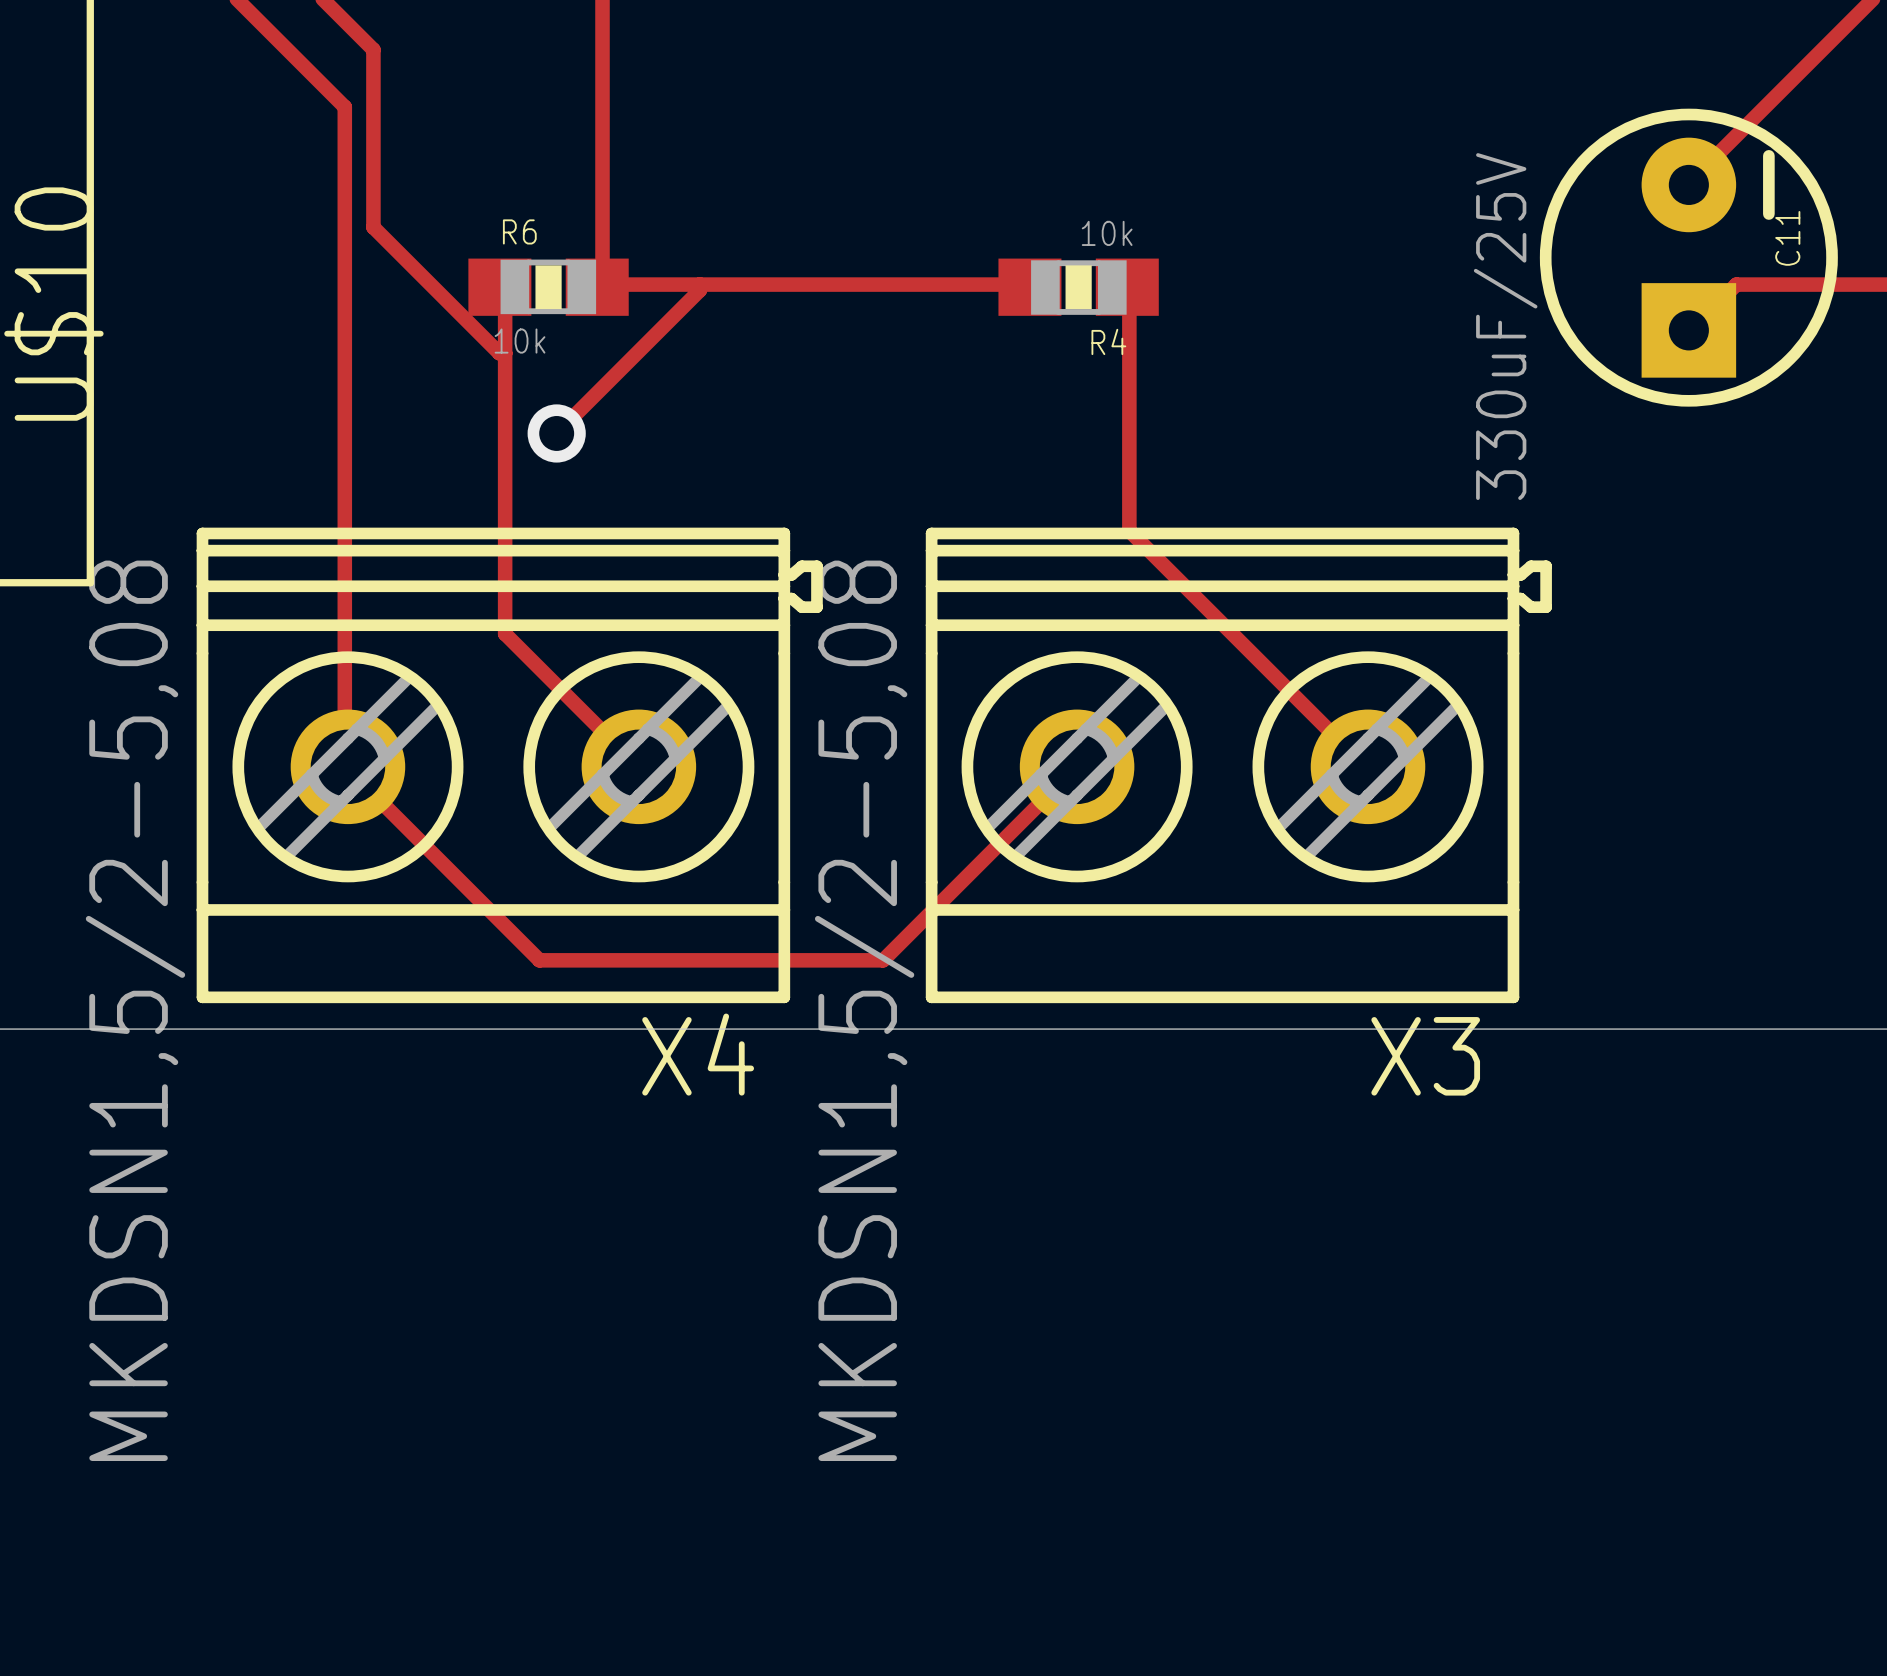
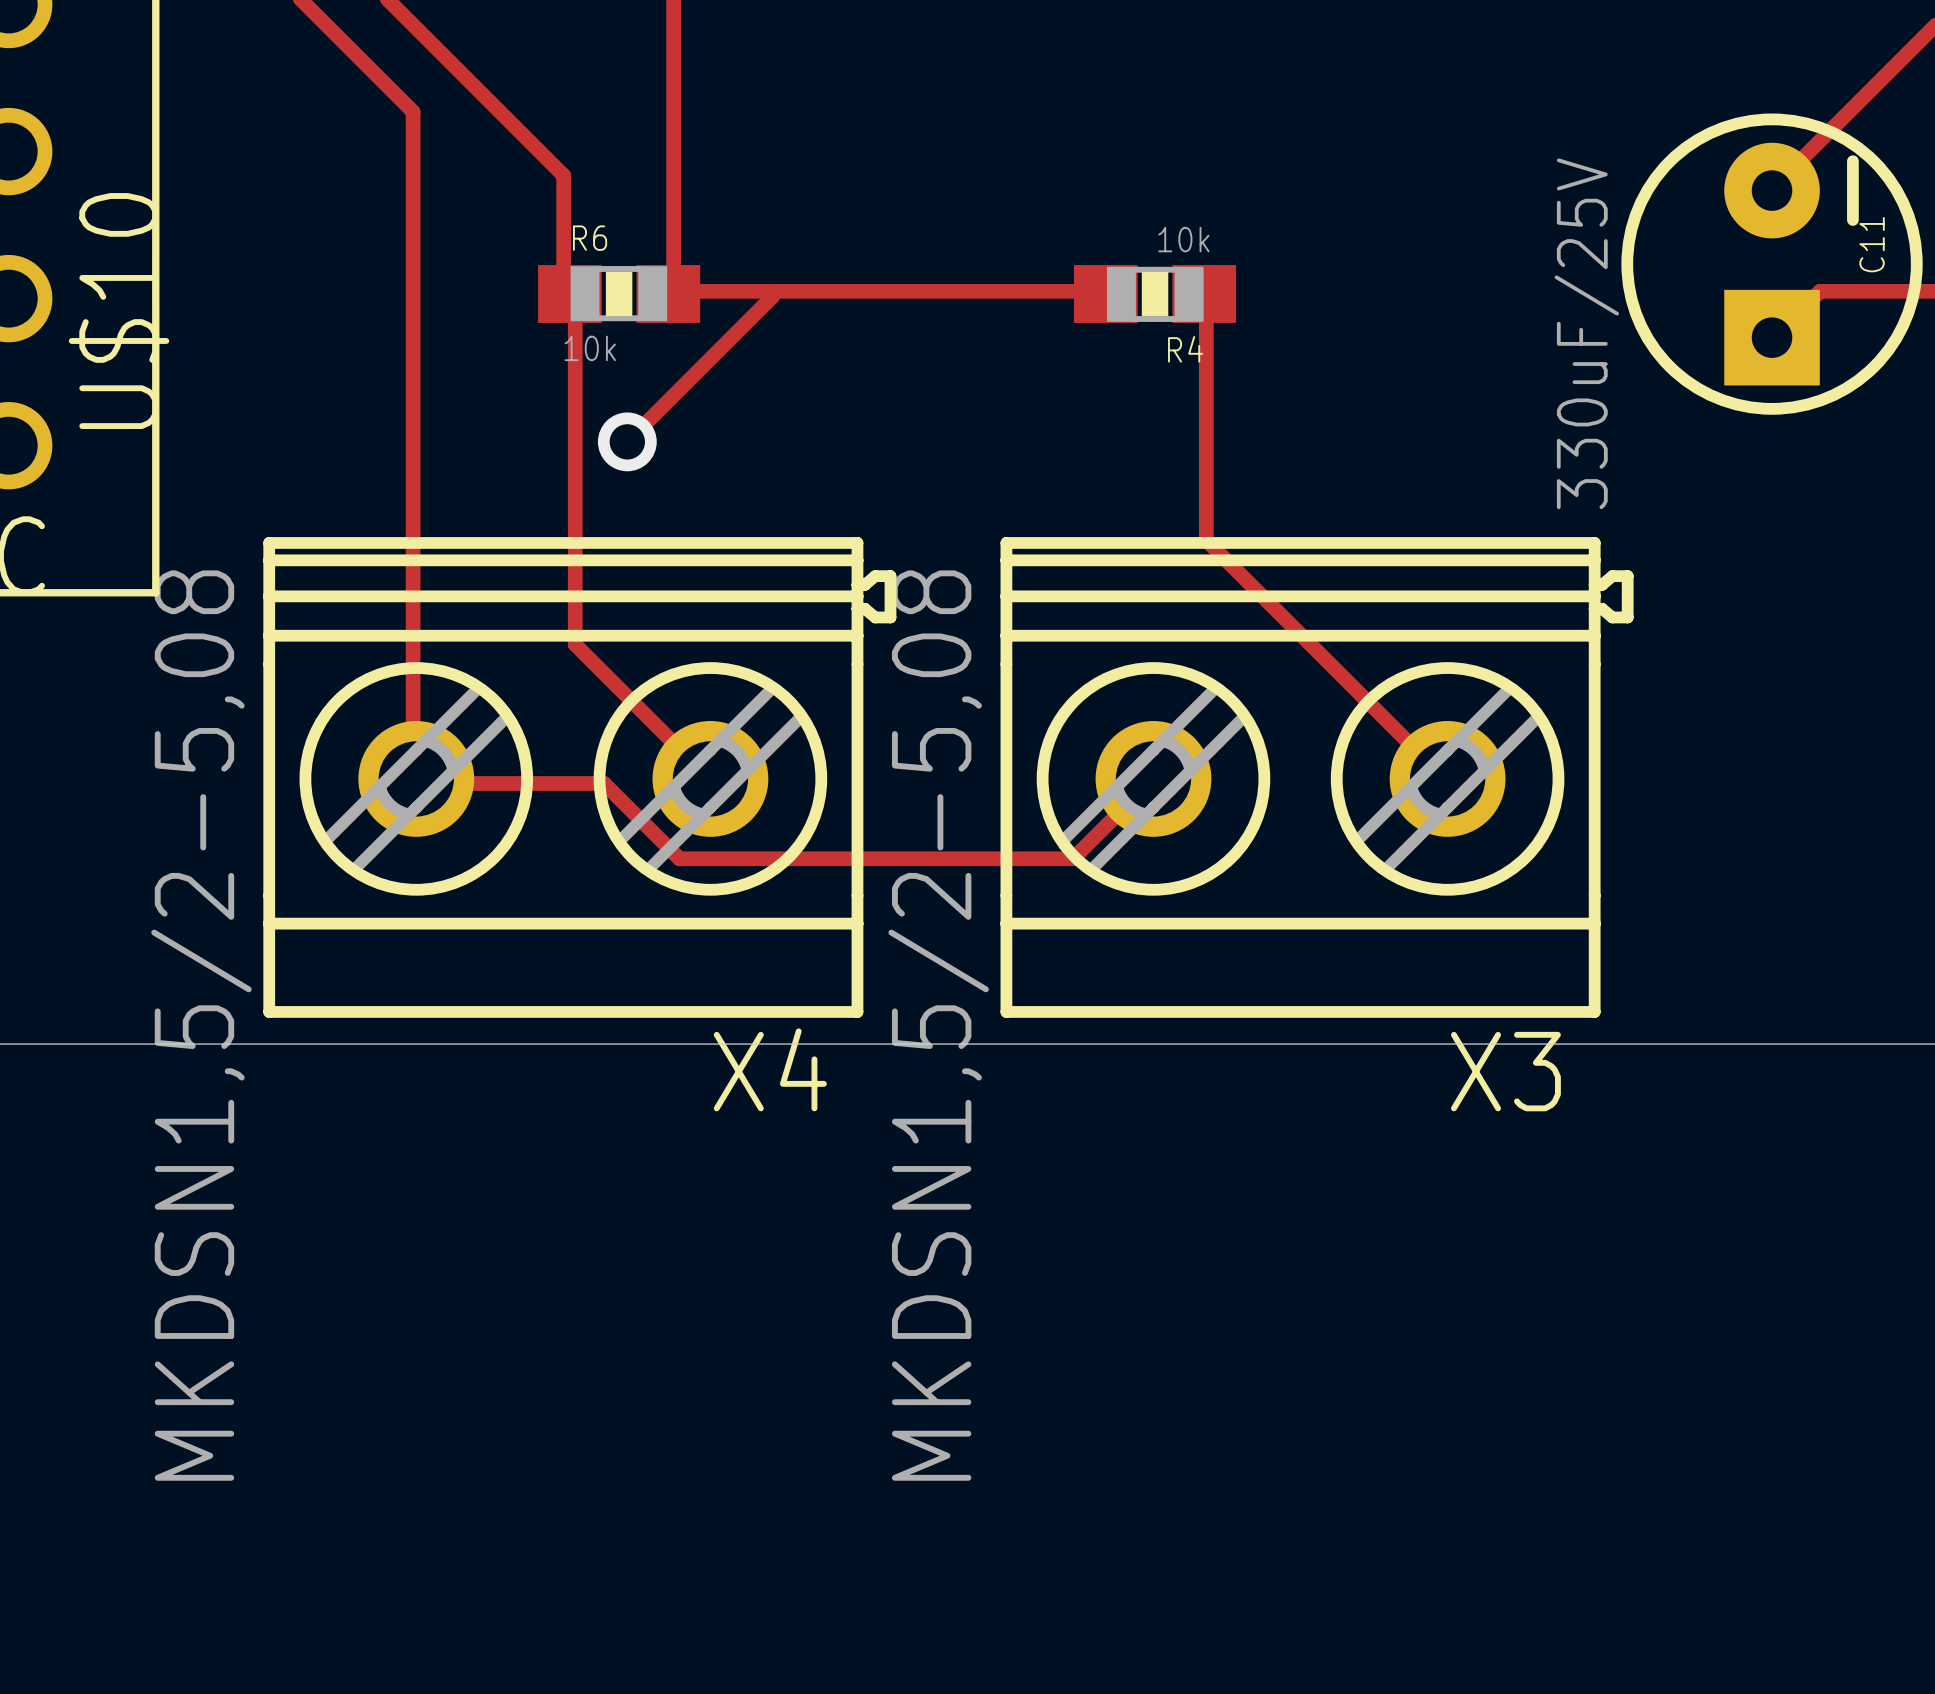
track: (373, 49) (373, 227) (499, 353) (505, 353) -> (442, 53) (563, 175) (563, 291) (569, 293)
track: (350, 771) (539, 960) (883, 960) (997, 845) -> (418, 783) (604, 783) (679, 858) (1073, 858)

